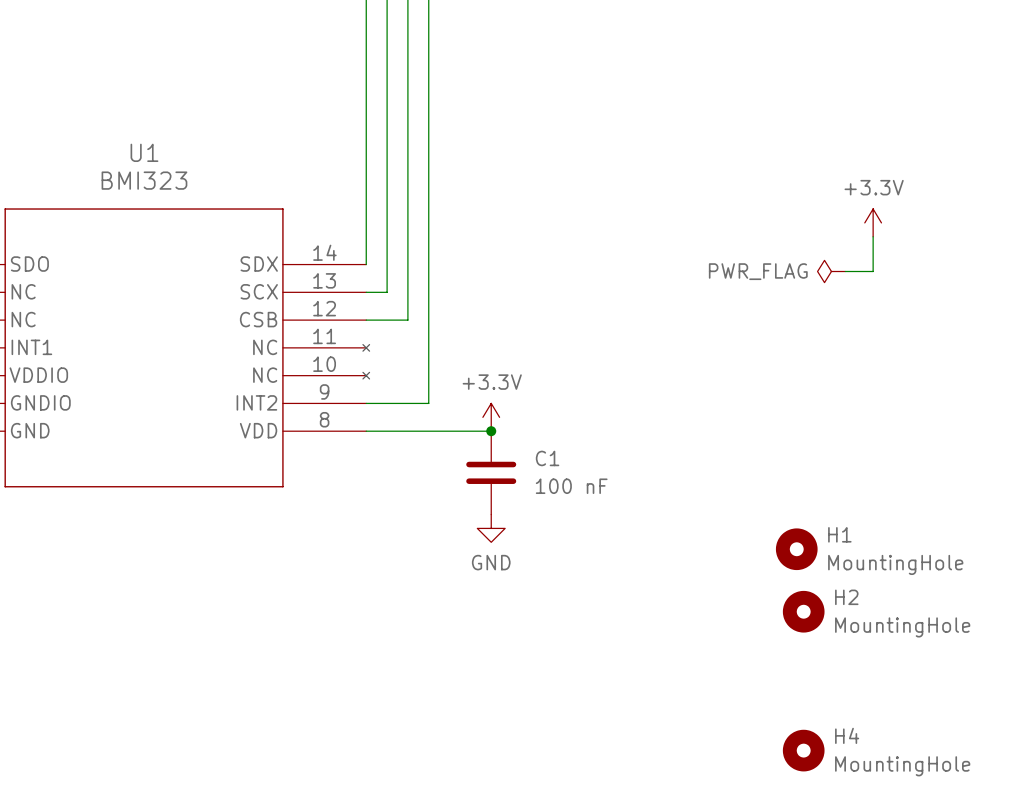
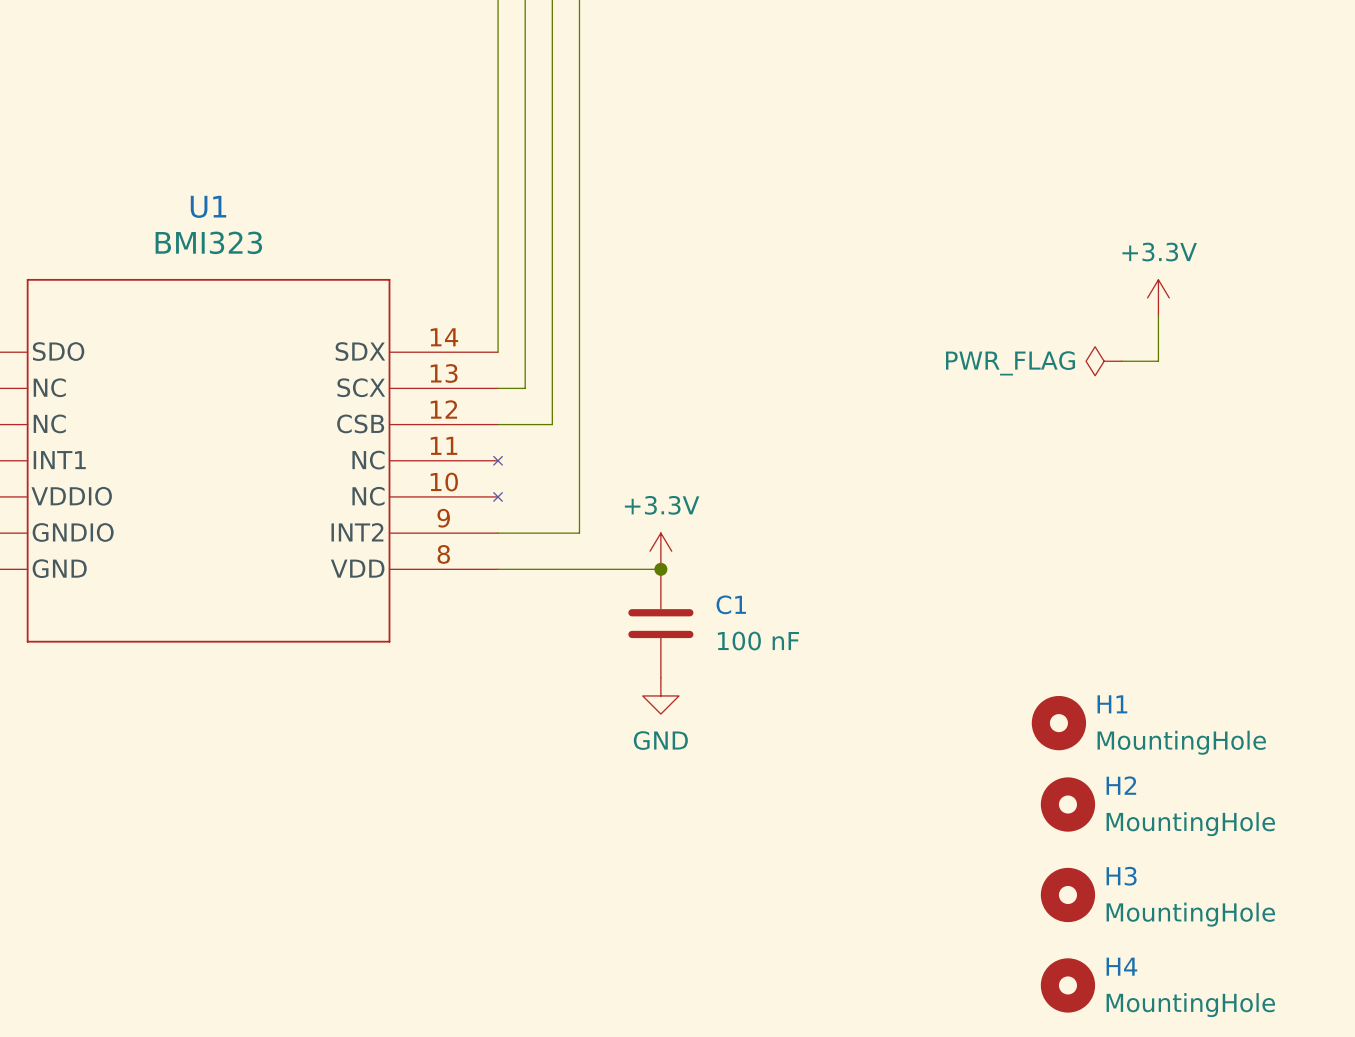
H3: none -> MountingHole (1067, 894)

